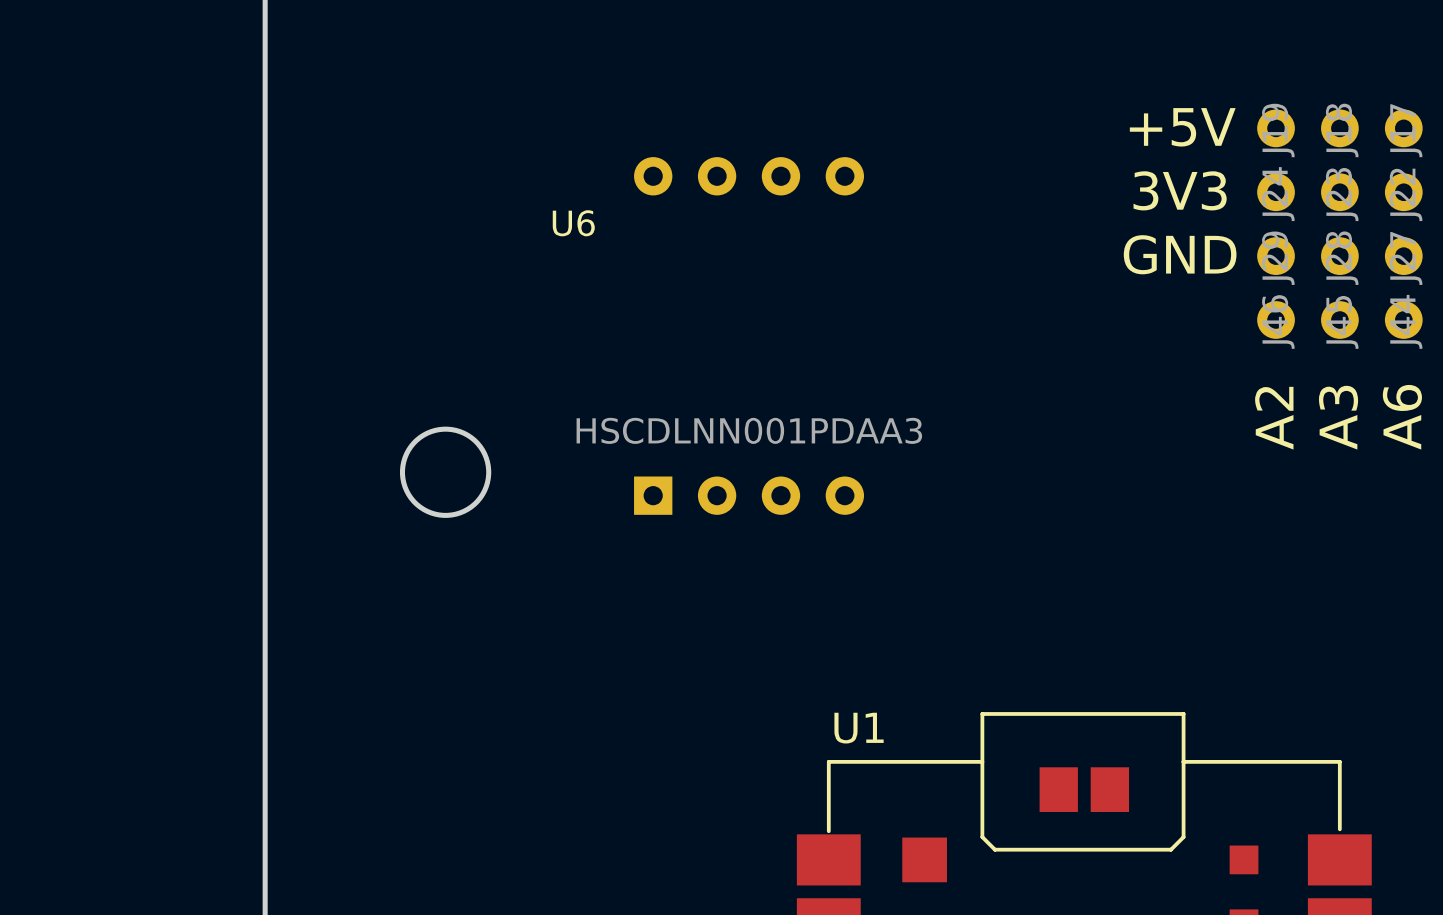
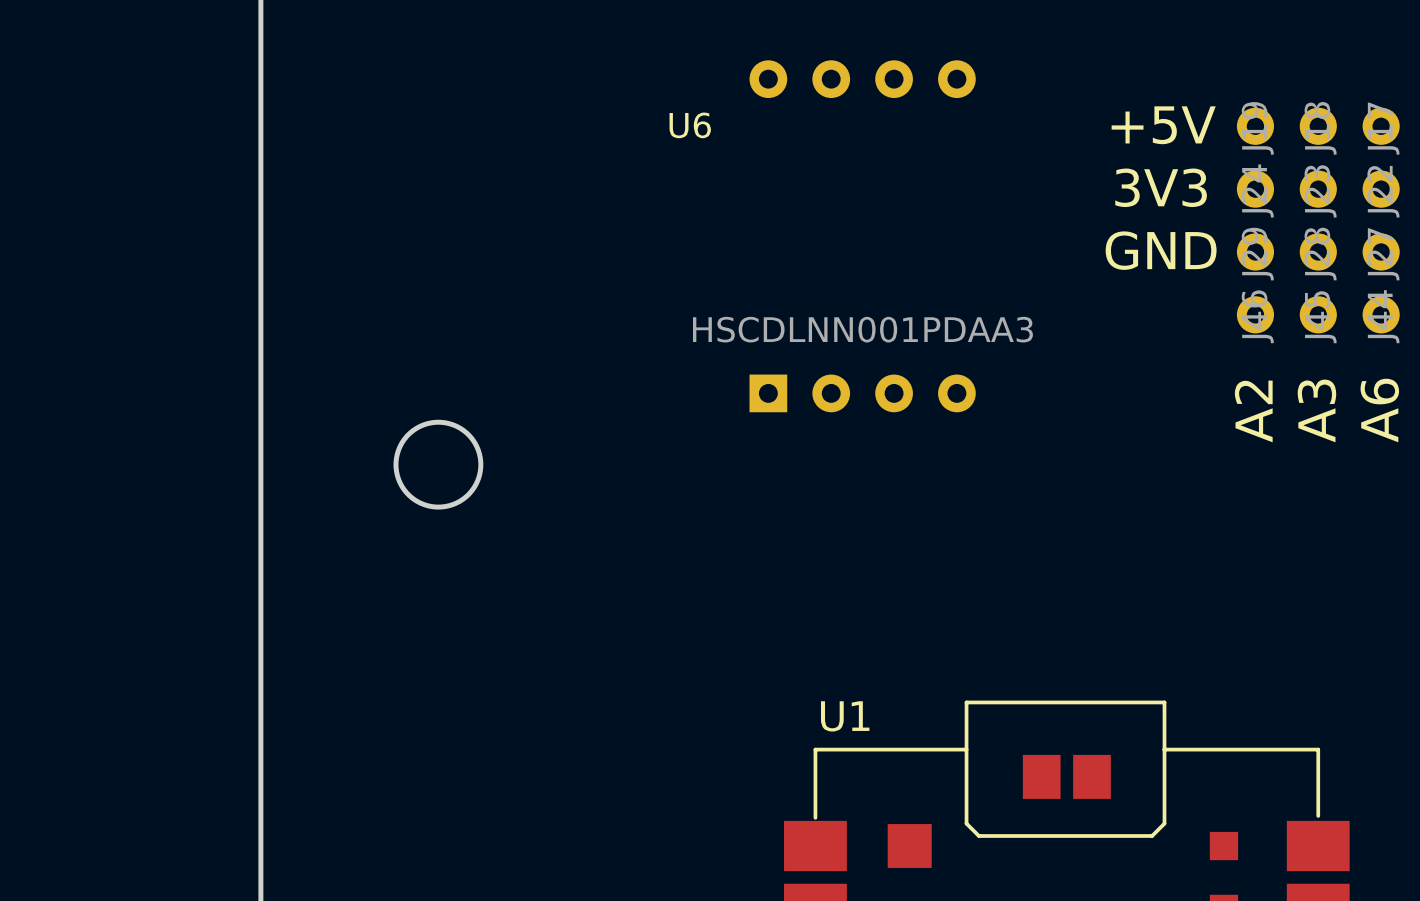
U6 position: (749, 335) -> (862, 236)

